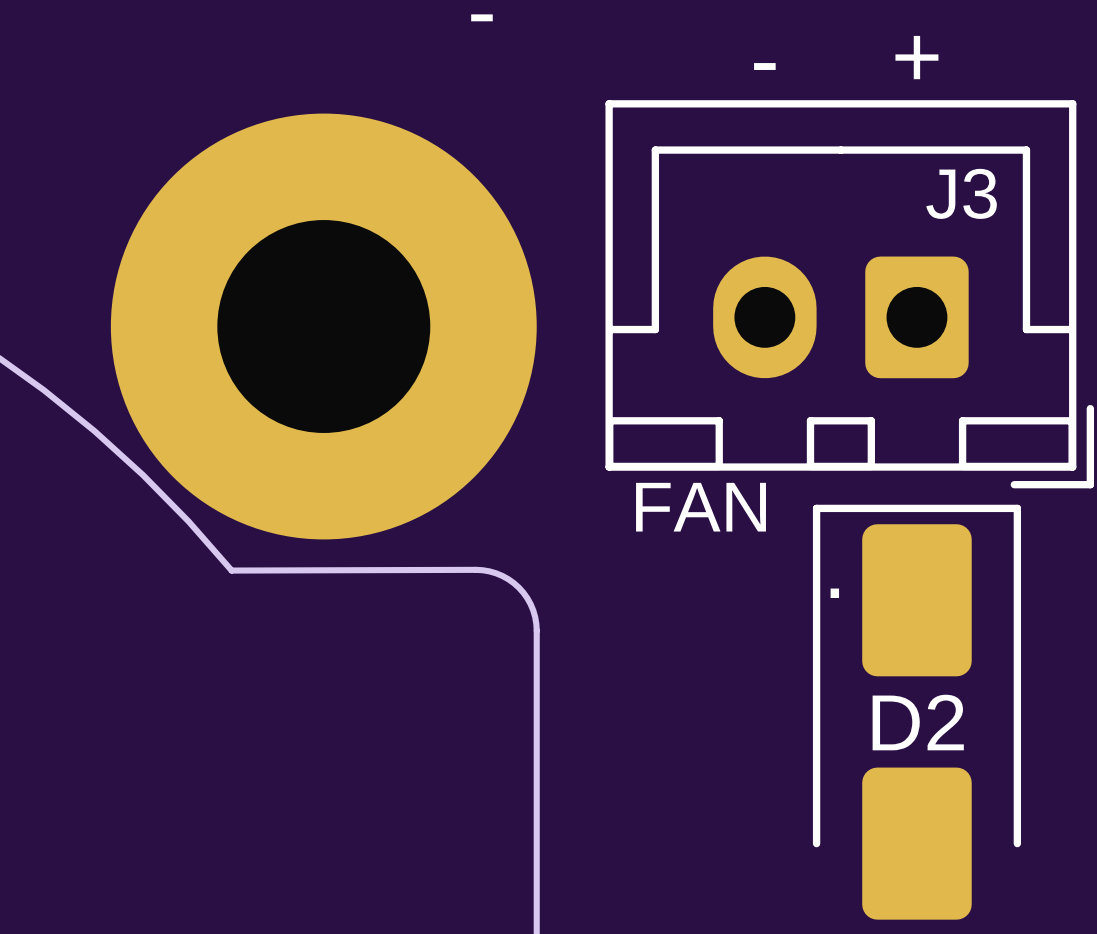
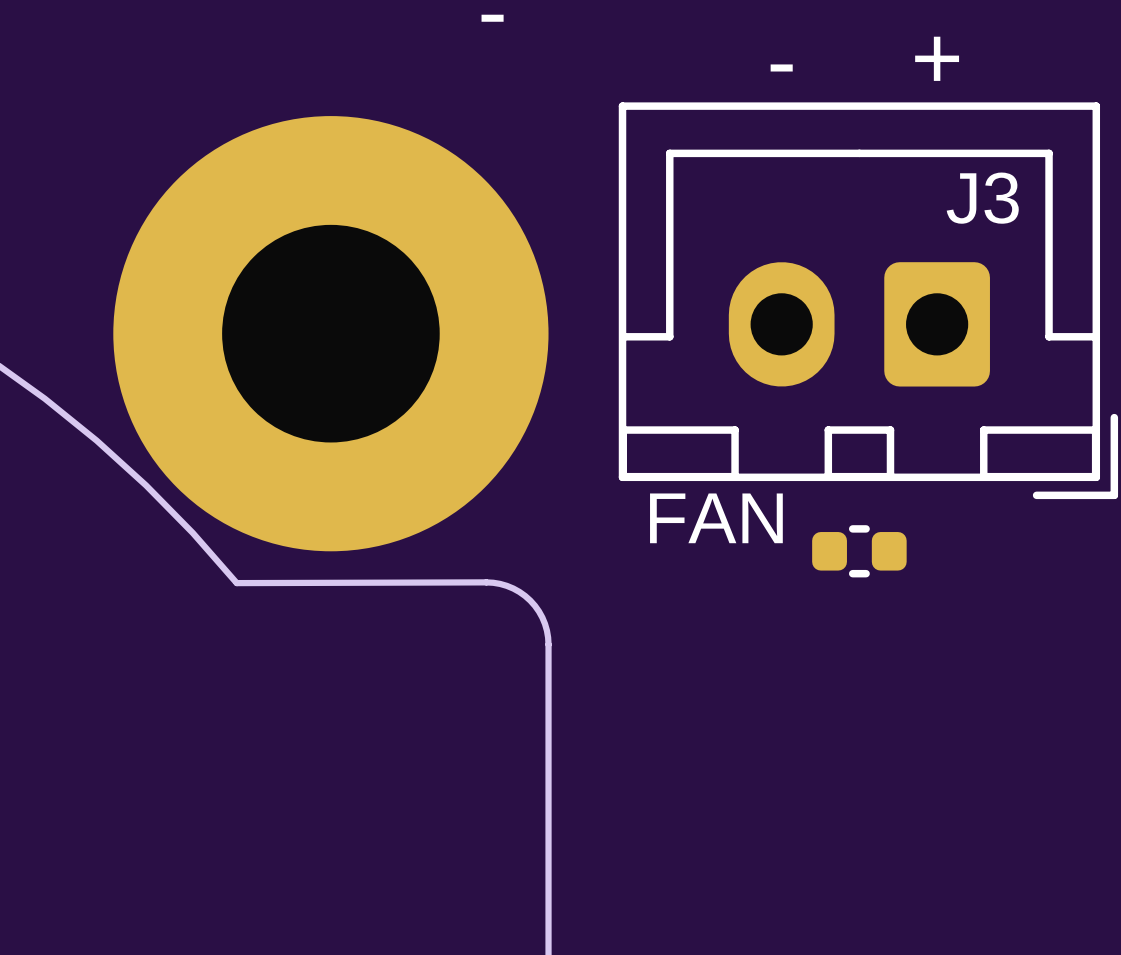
part: none -> (859, 551)
text: . (834, 593) -> none
D2: (916, 712) -> none

